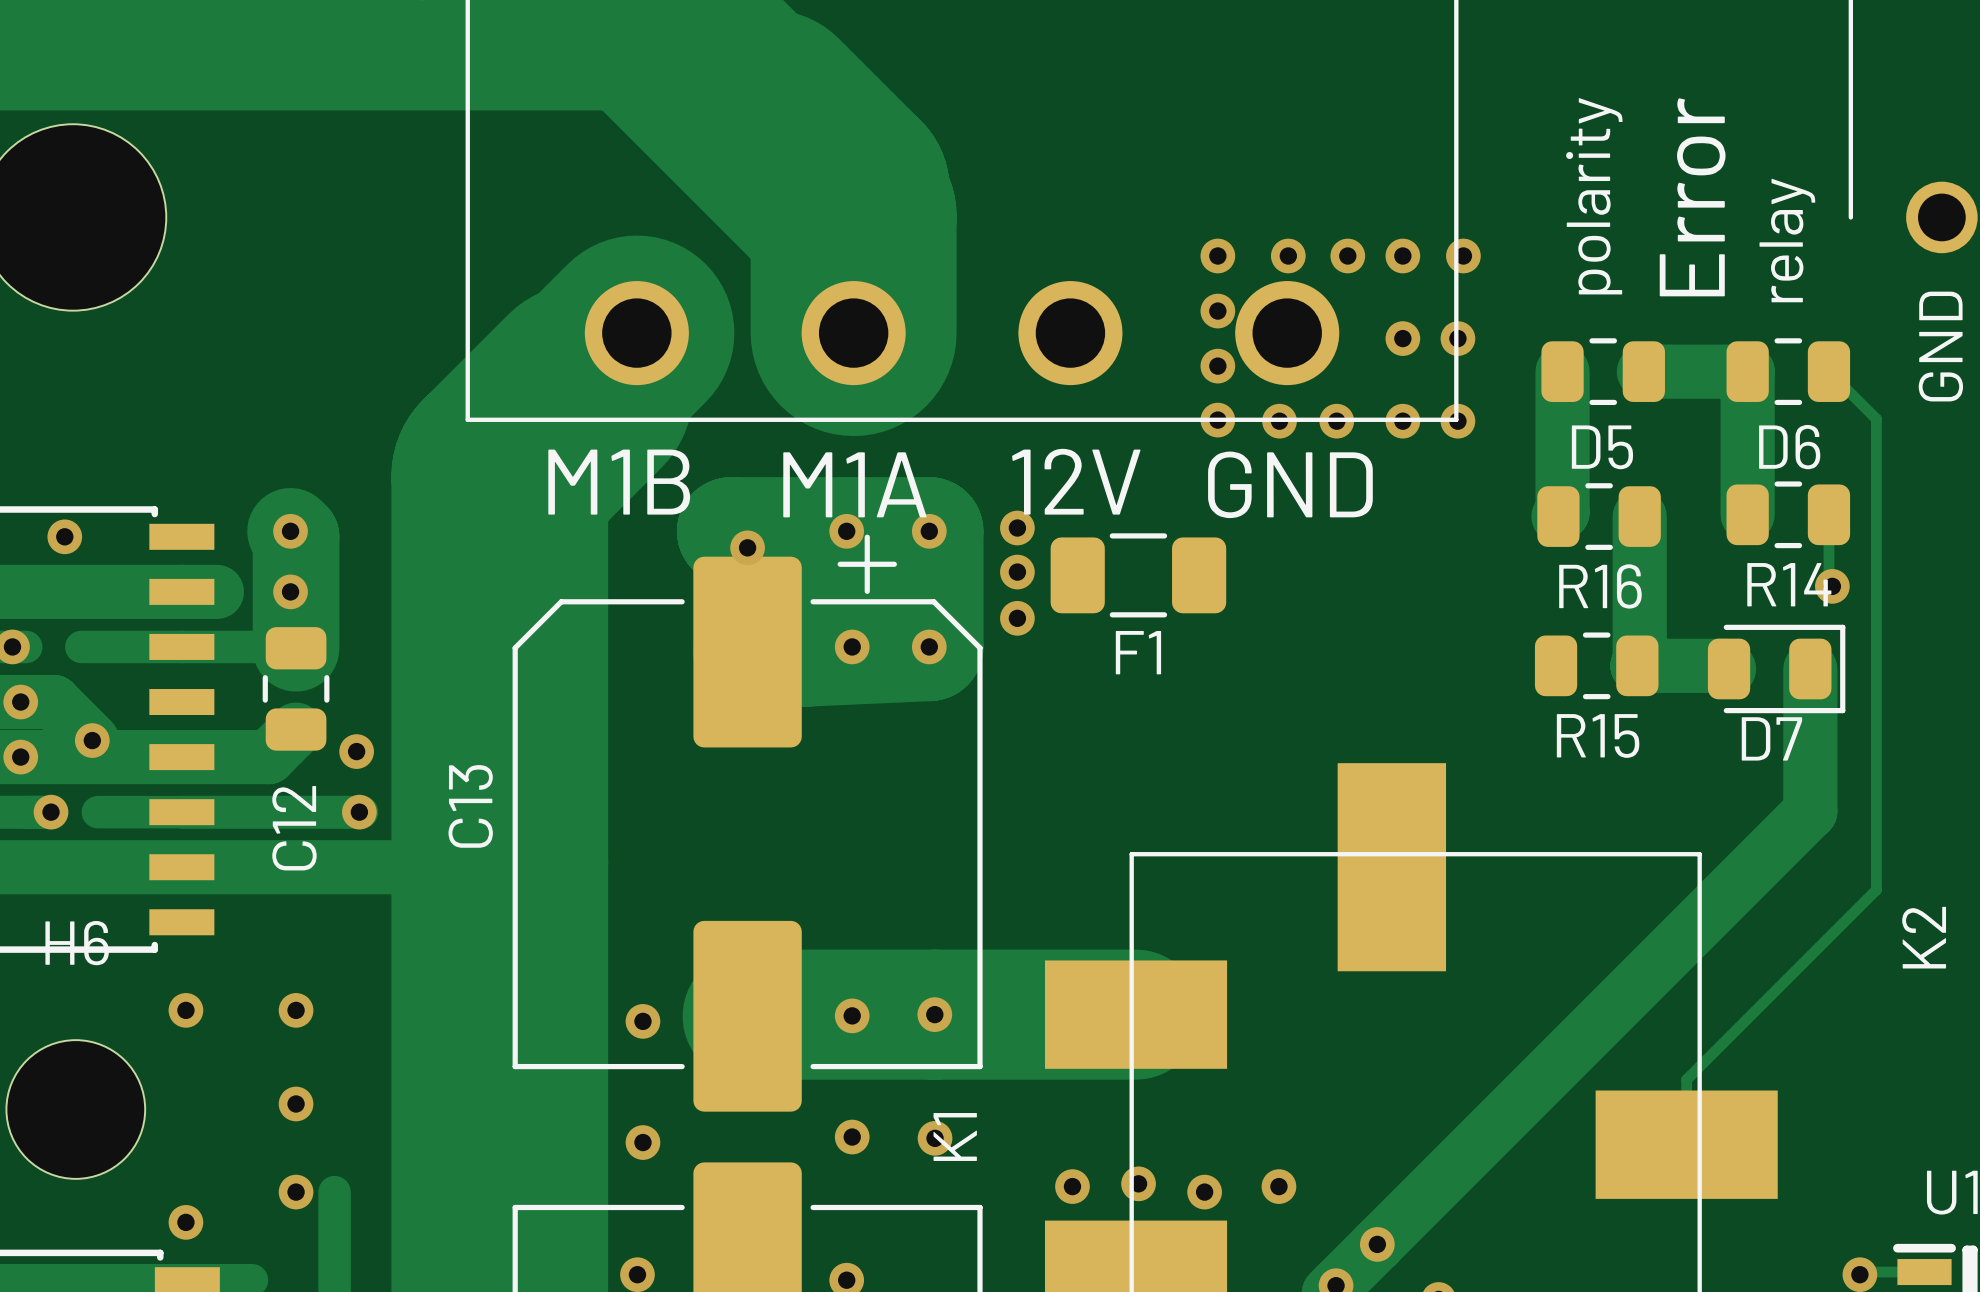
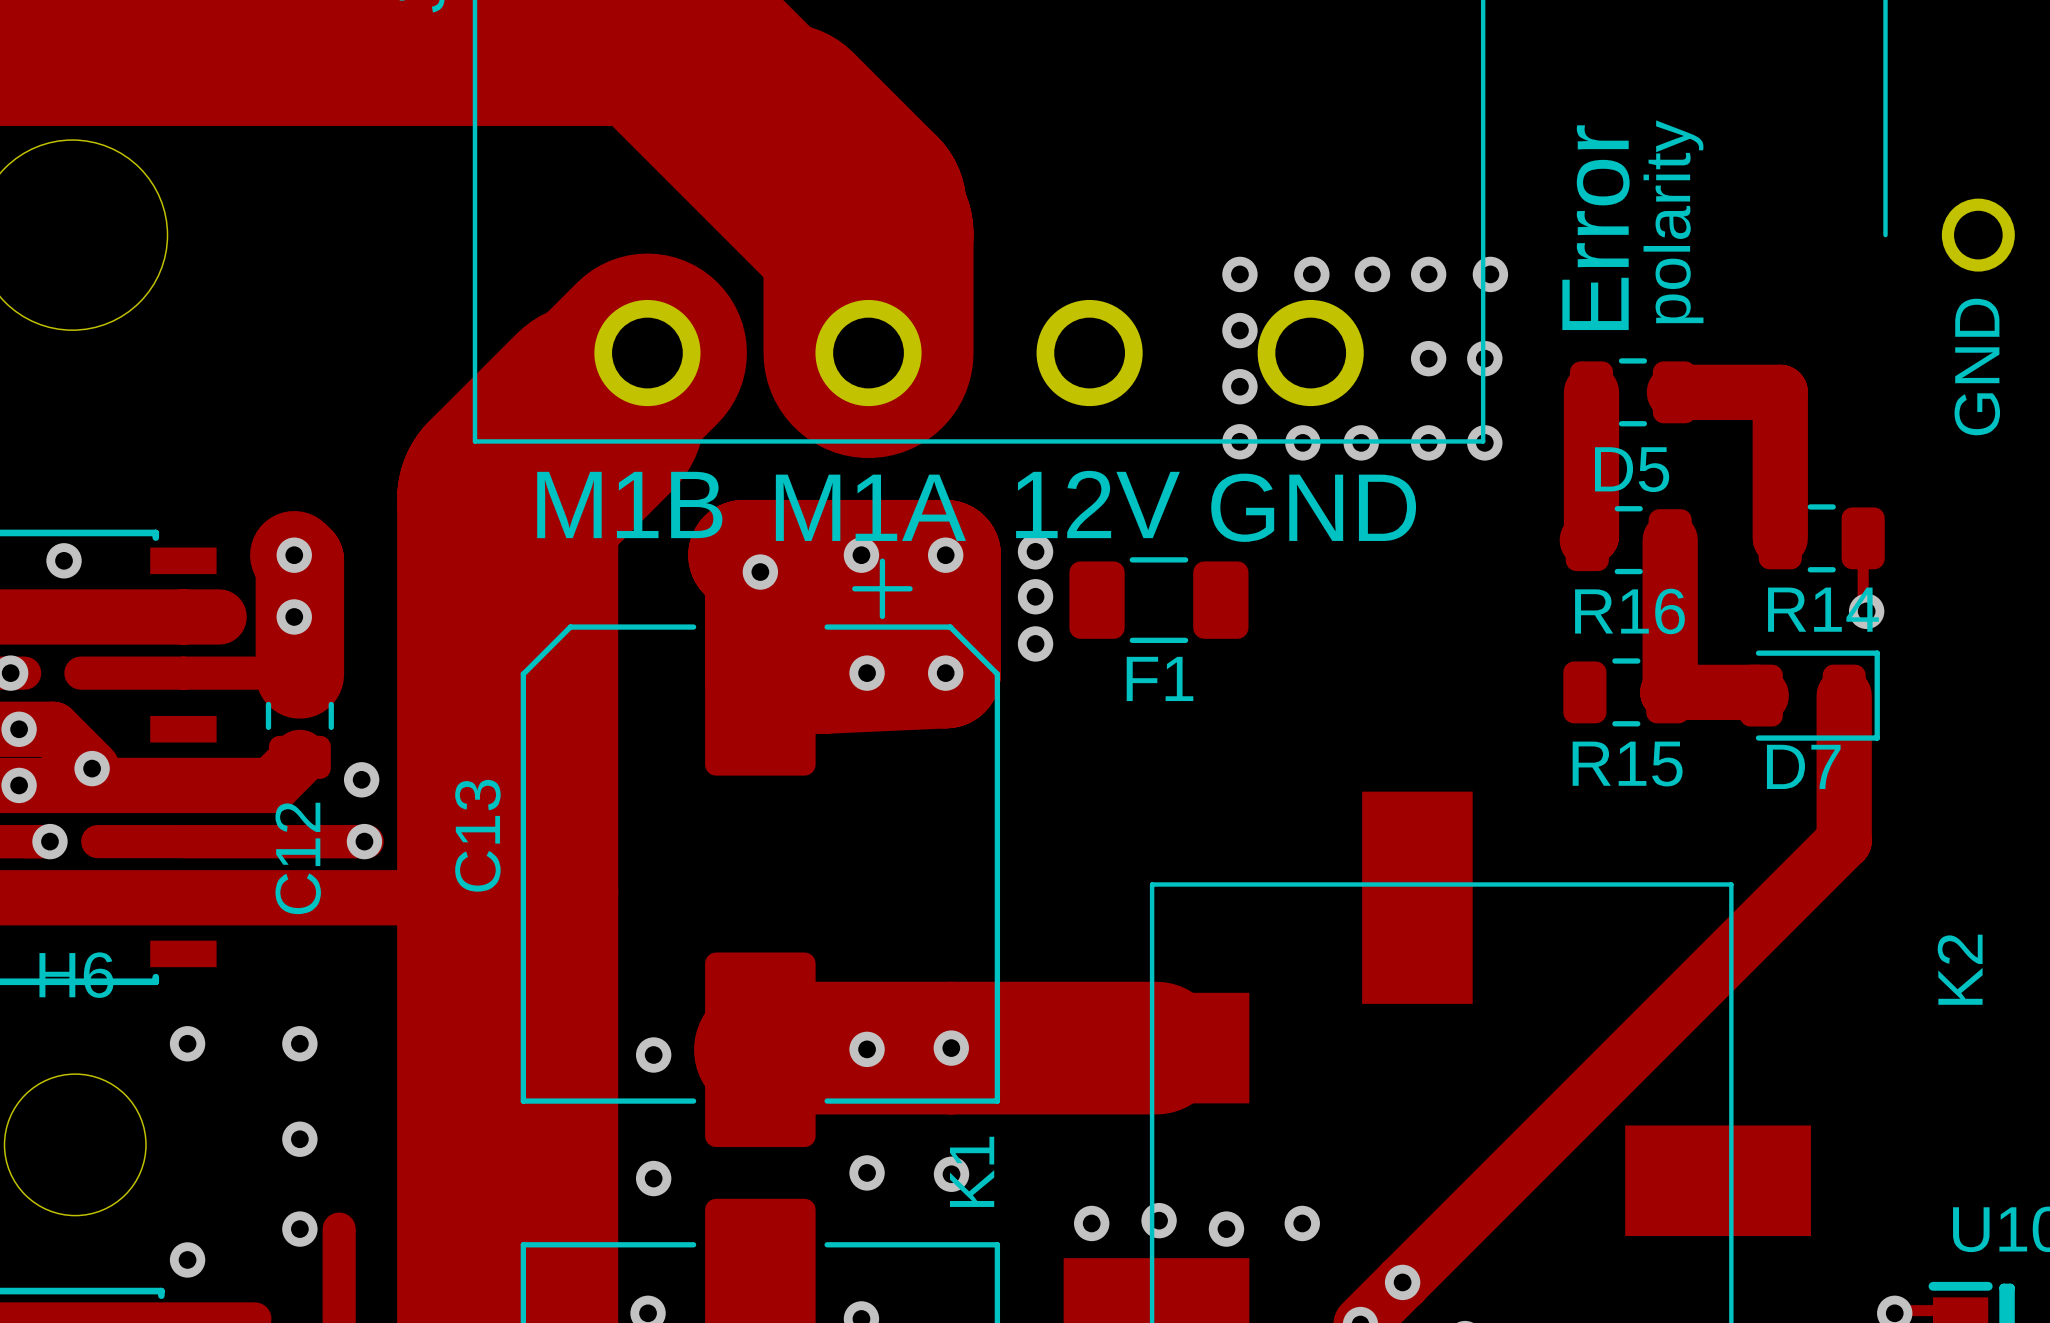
text position: polarity (1594, 196) -> polarity (1673, 221)
text position: Error (1692, 197) -> Error (1596, 227)
text: relay (1787, 240) -> none
D6: (1788, 371) -> none
track: (1828, 371) (1876, 419) (1876, 889) (1686, 1079) (1686, 1144) -> none

